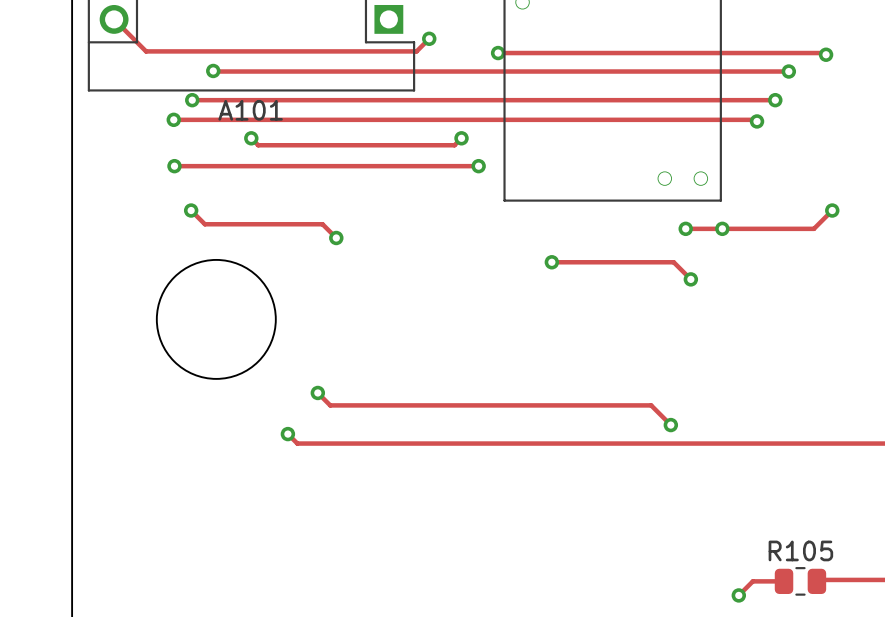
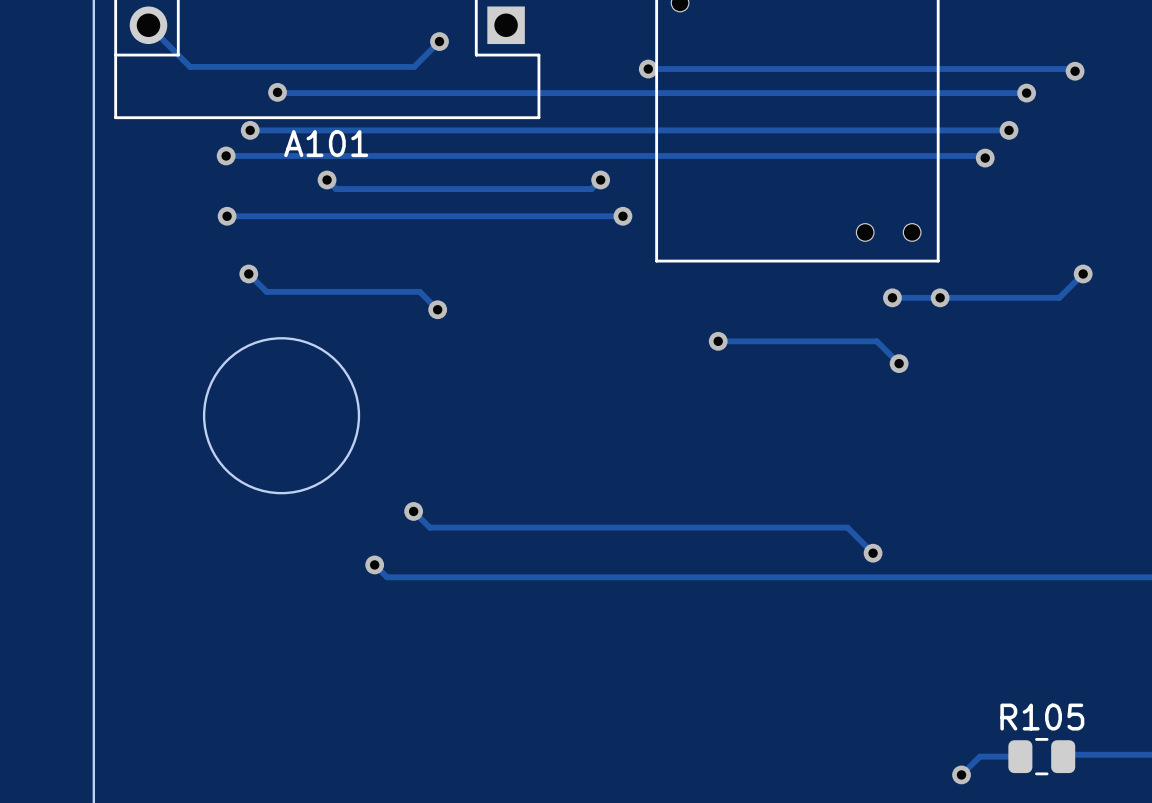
track: (429, 38) (416, 51) (318, 51) -> (439, 41) (414, 66)
via position: (429, 38) -> (439, 41)

